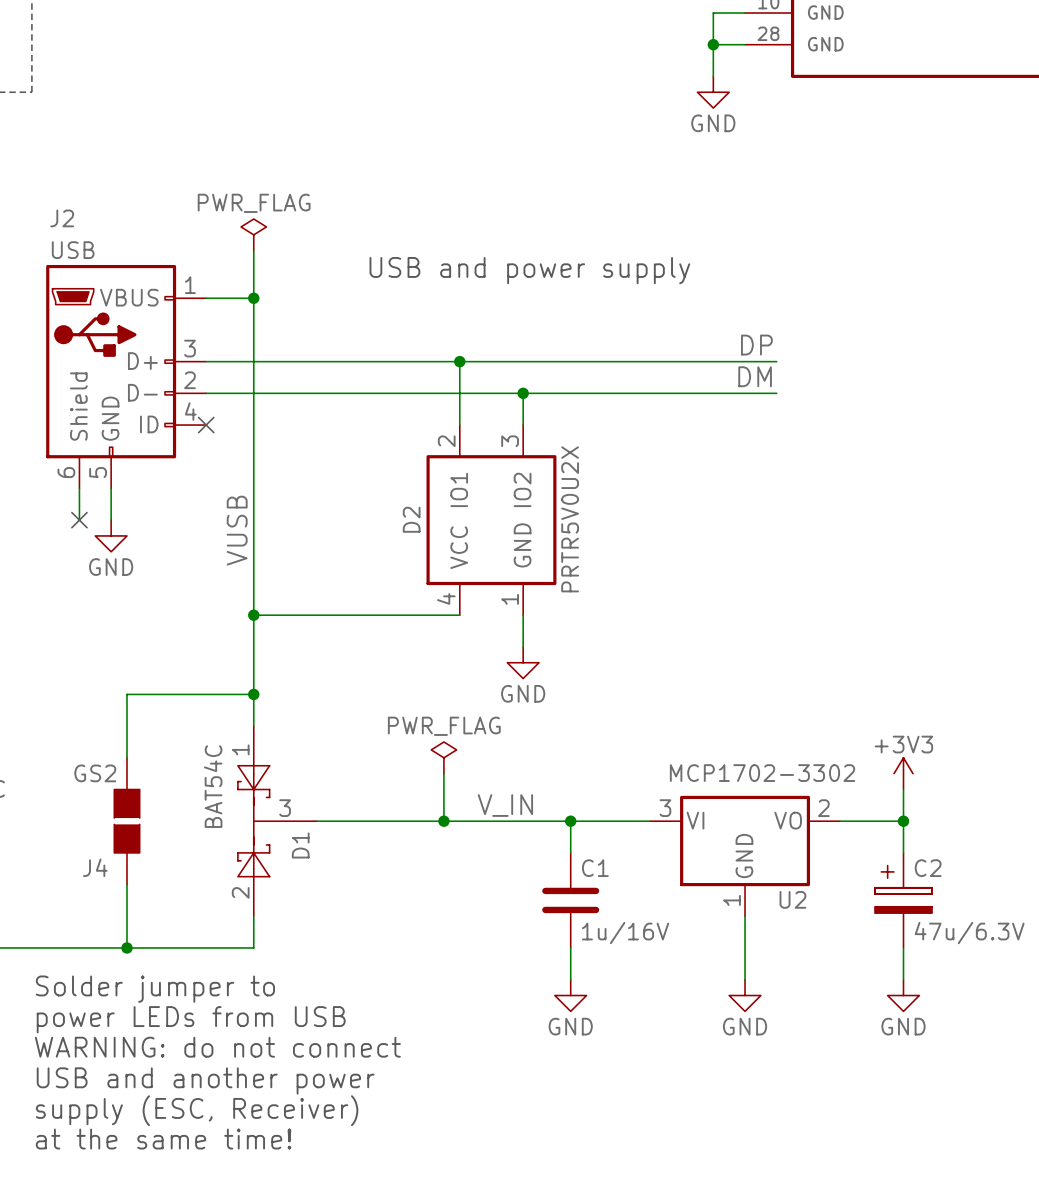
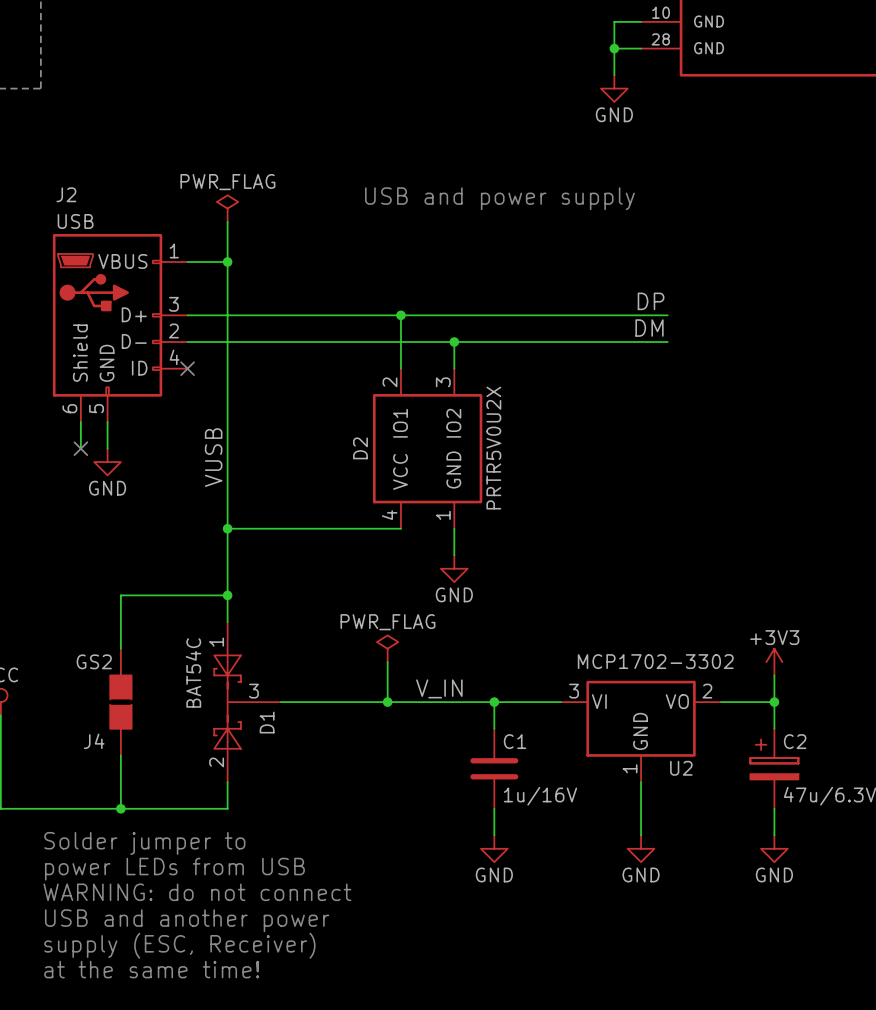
text position: USB and power supply (529, 270) -> USB and power supply (499, 198)

